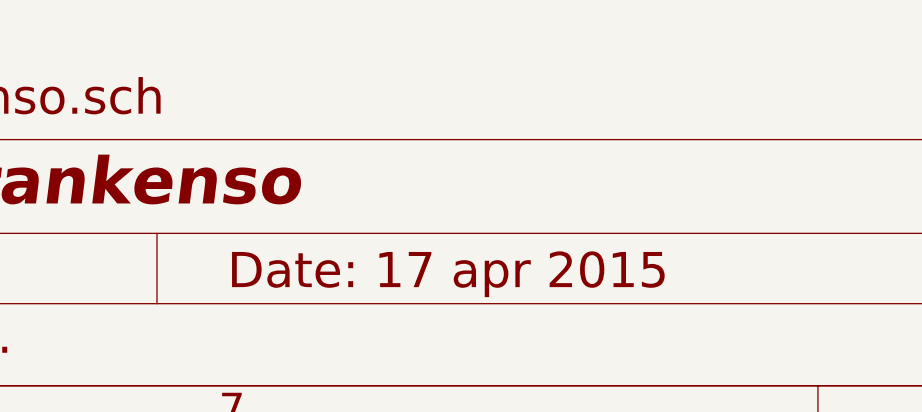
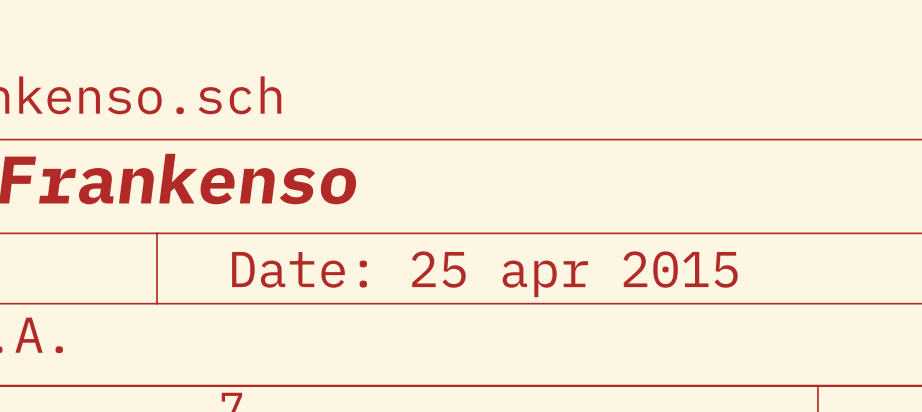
title block: Date: 17 apr 2015 (448, 274) -> Date: 25 apr 2015 (484, 274)

